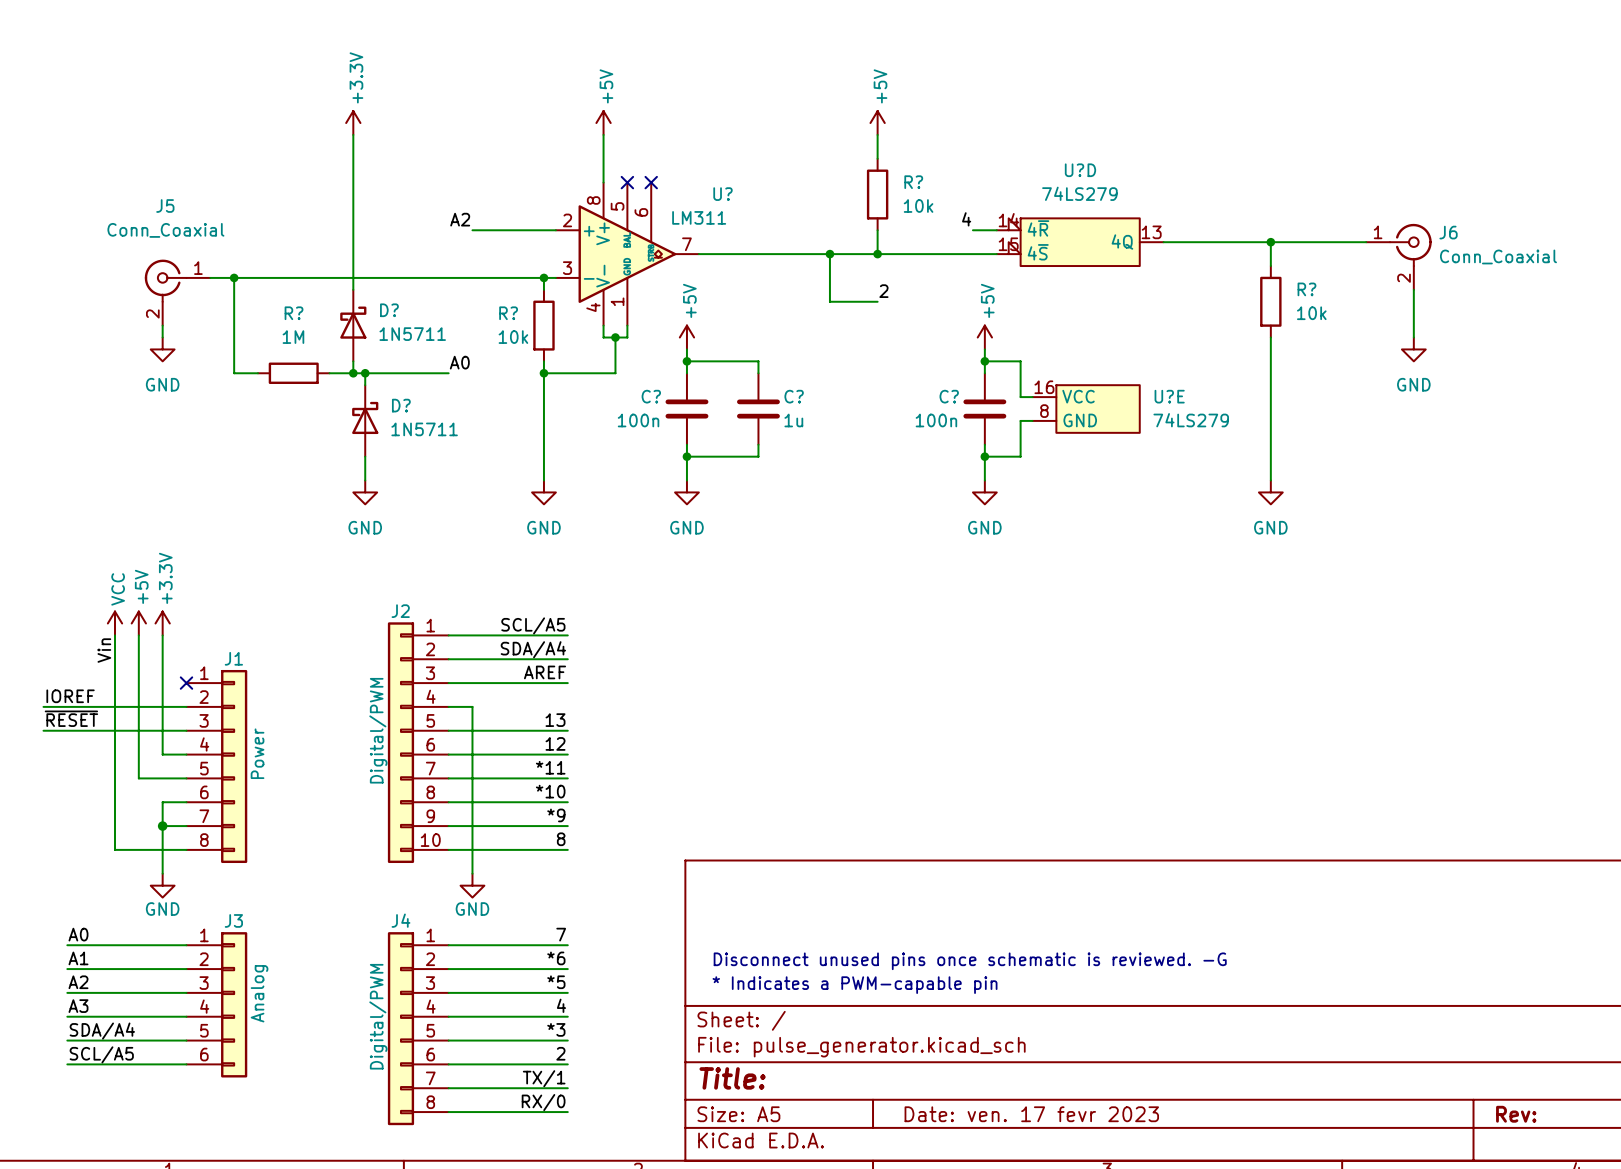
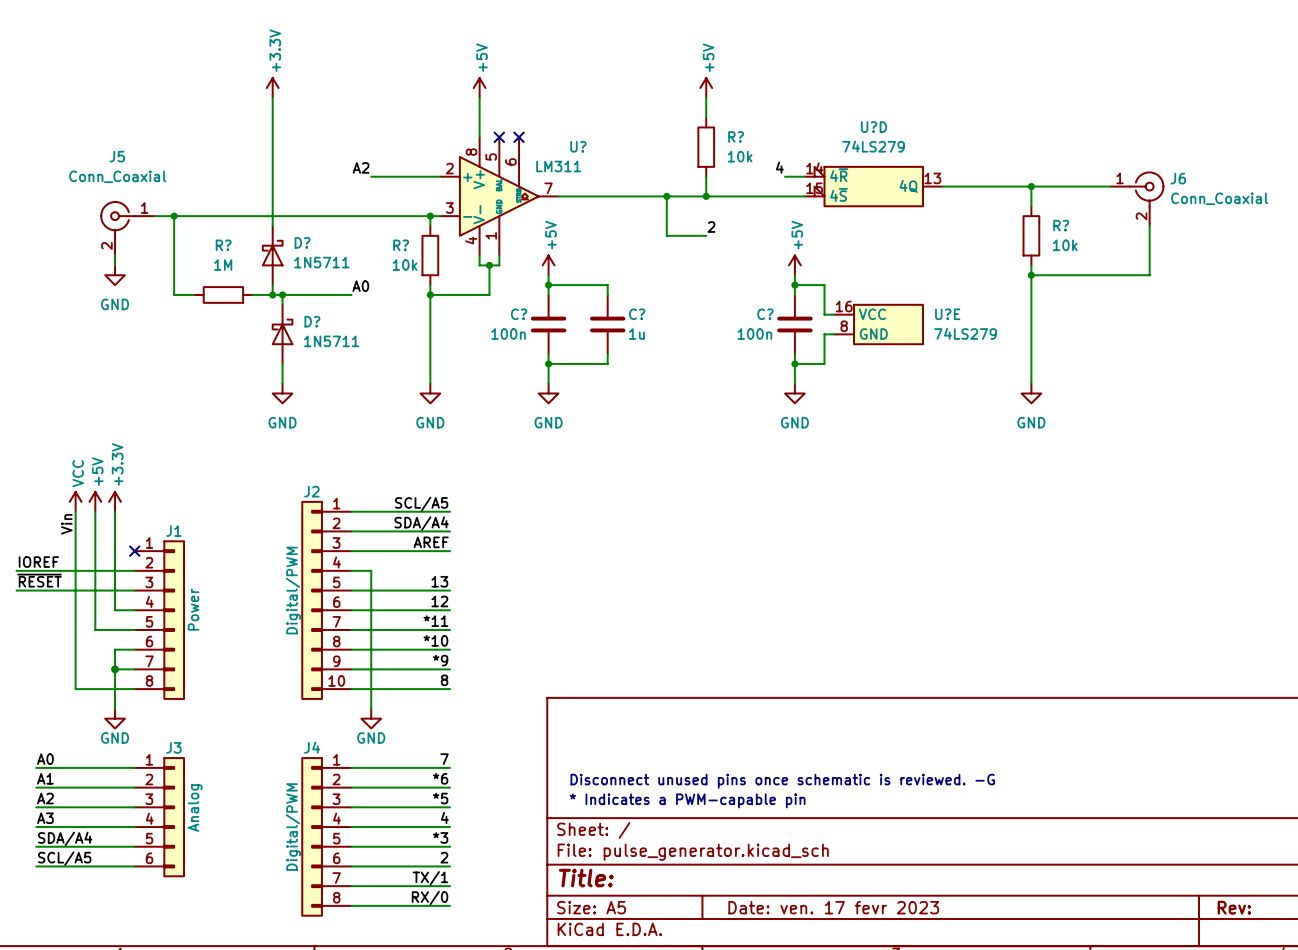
wire: none -> (1149, 265) (1149, 275) (1031, 275)
junction: none -> (1031, 275)
power symbol: GND (1413, 349) -> none

